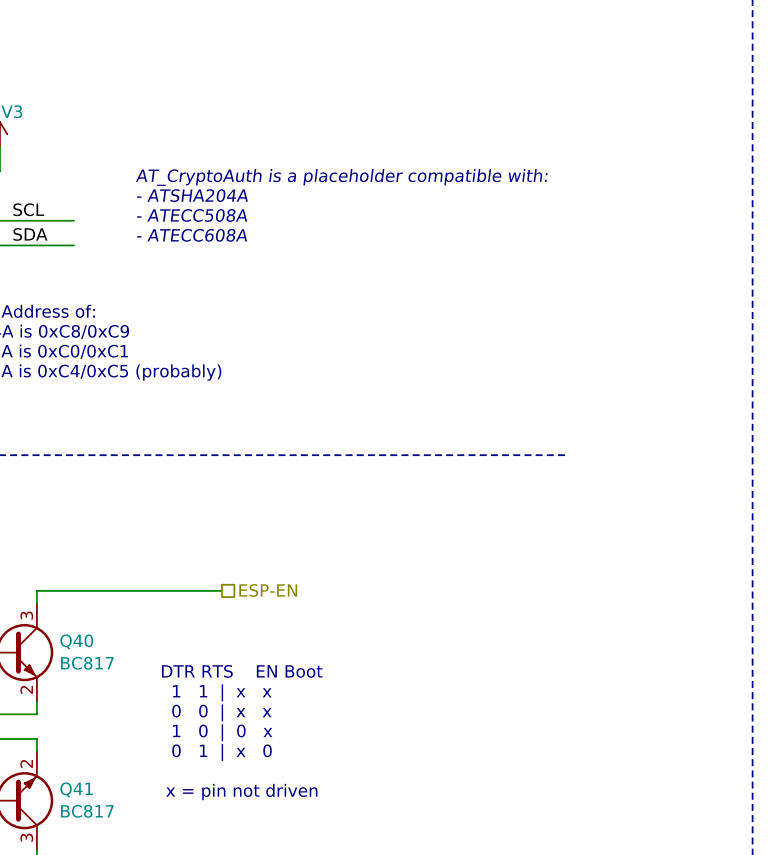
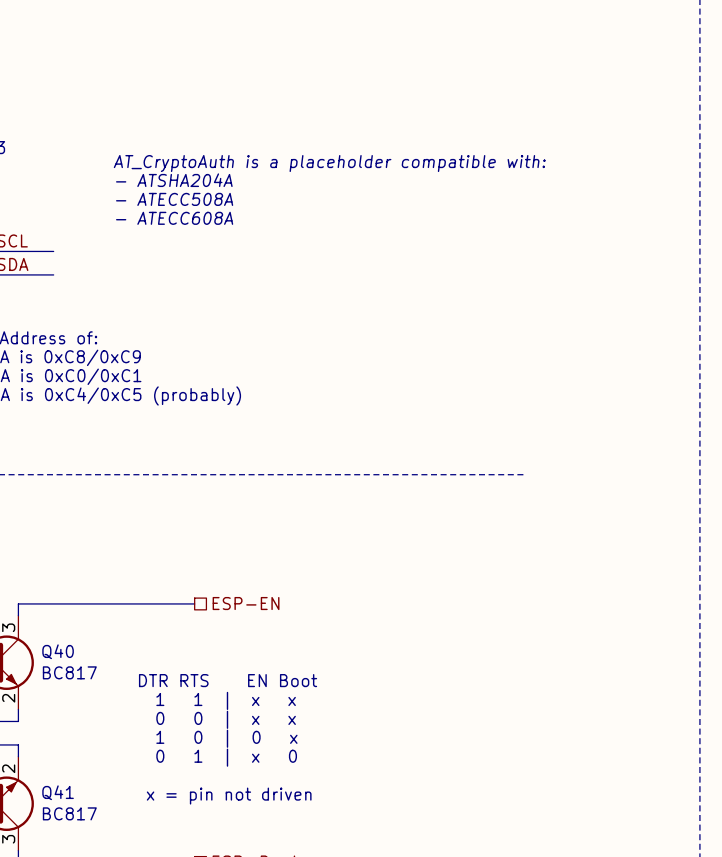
text position: AT_CryptoAuth is a placeholder compatible with: (341, 177) -> AT_CryptoAuth is a placeholder compatible with: (329, 163)
text position: - ATSHA204A (192, 195) -> - ATSHA204A (174, 180)
text position: - ATECC508A (192, 215) -> - ATECC508A (174, 199)
text position: - ATECC608A (192, 235) -> - ATECC608A (174, 218)

